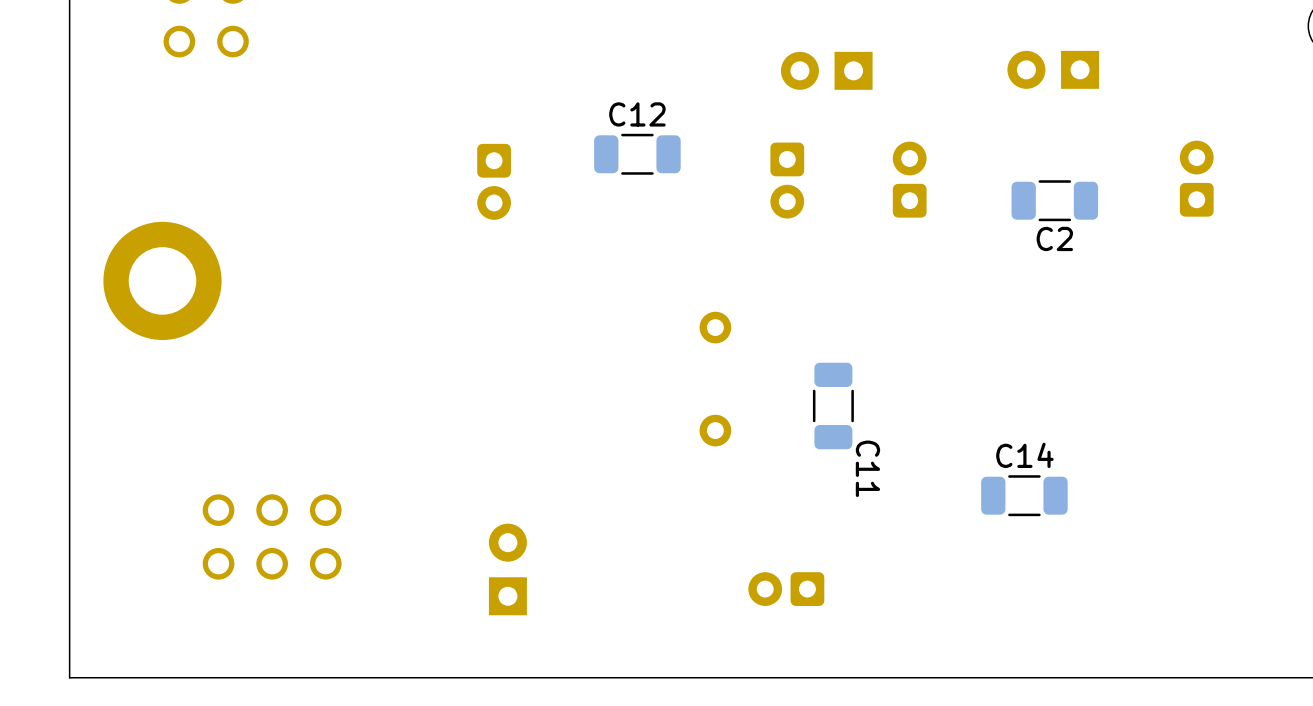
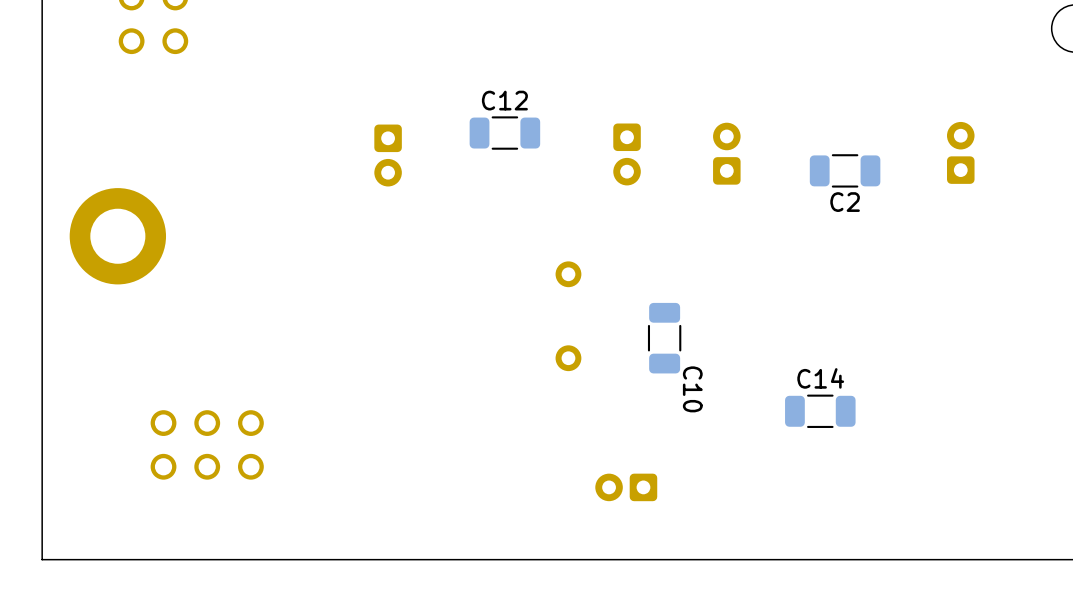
part: (1053, 69) -> none
part: (826, 70) -> none
C11 name: C11 (867, 468) -> C10 (692, 389)
part: (507, 569) -> none

